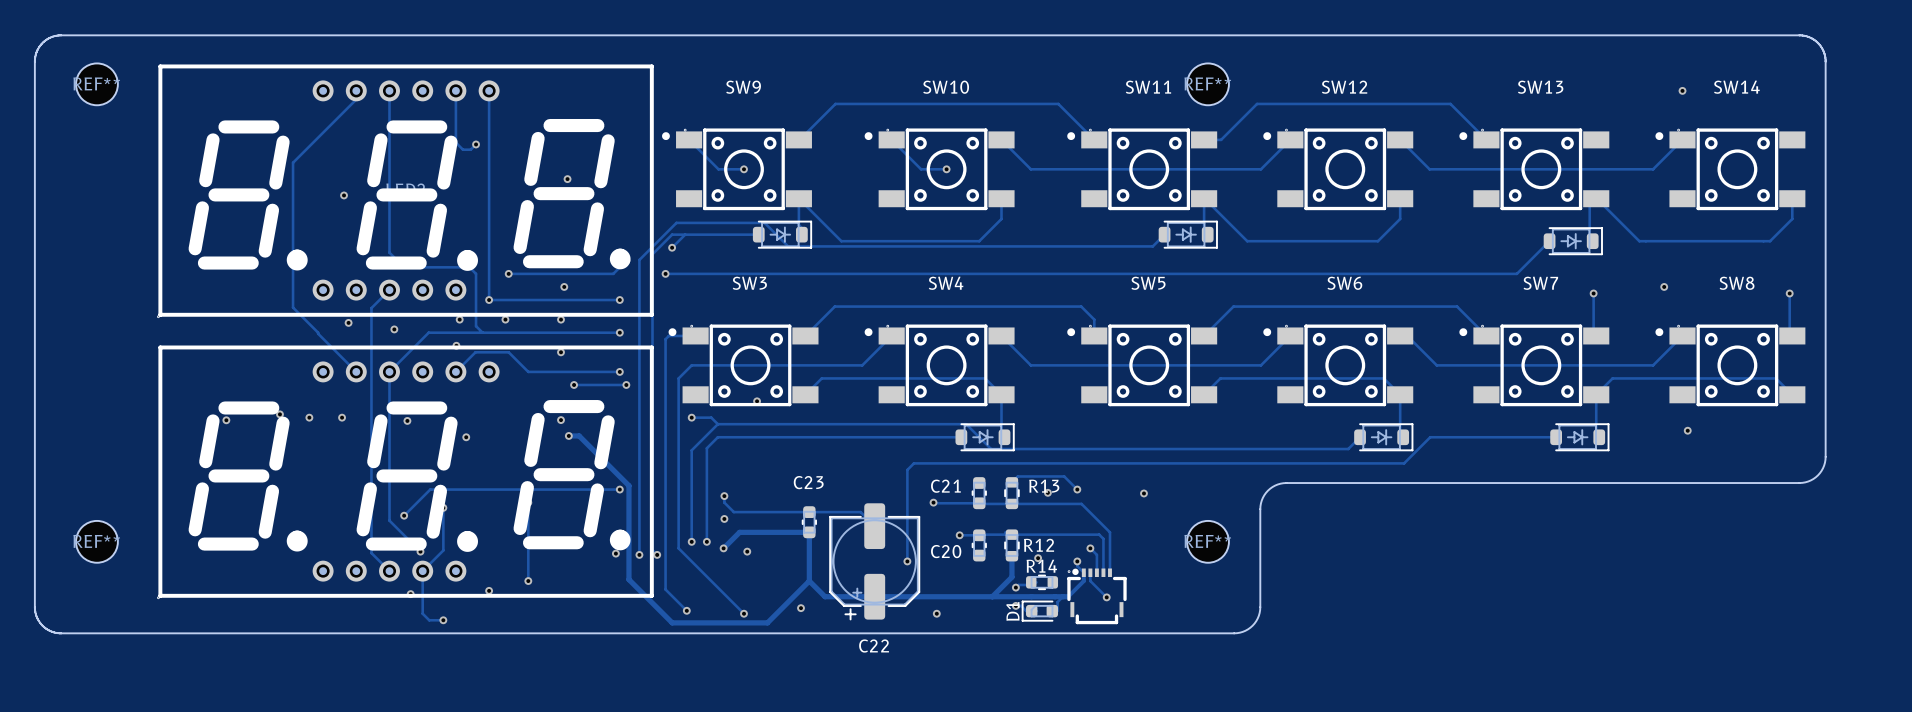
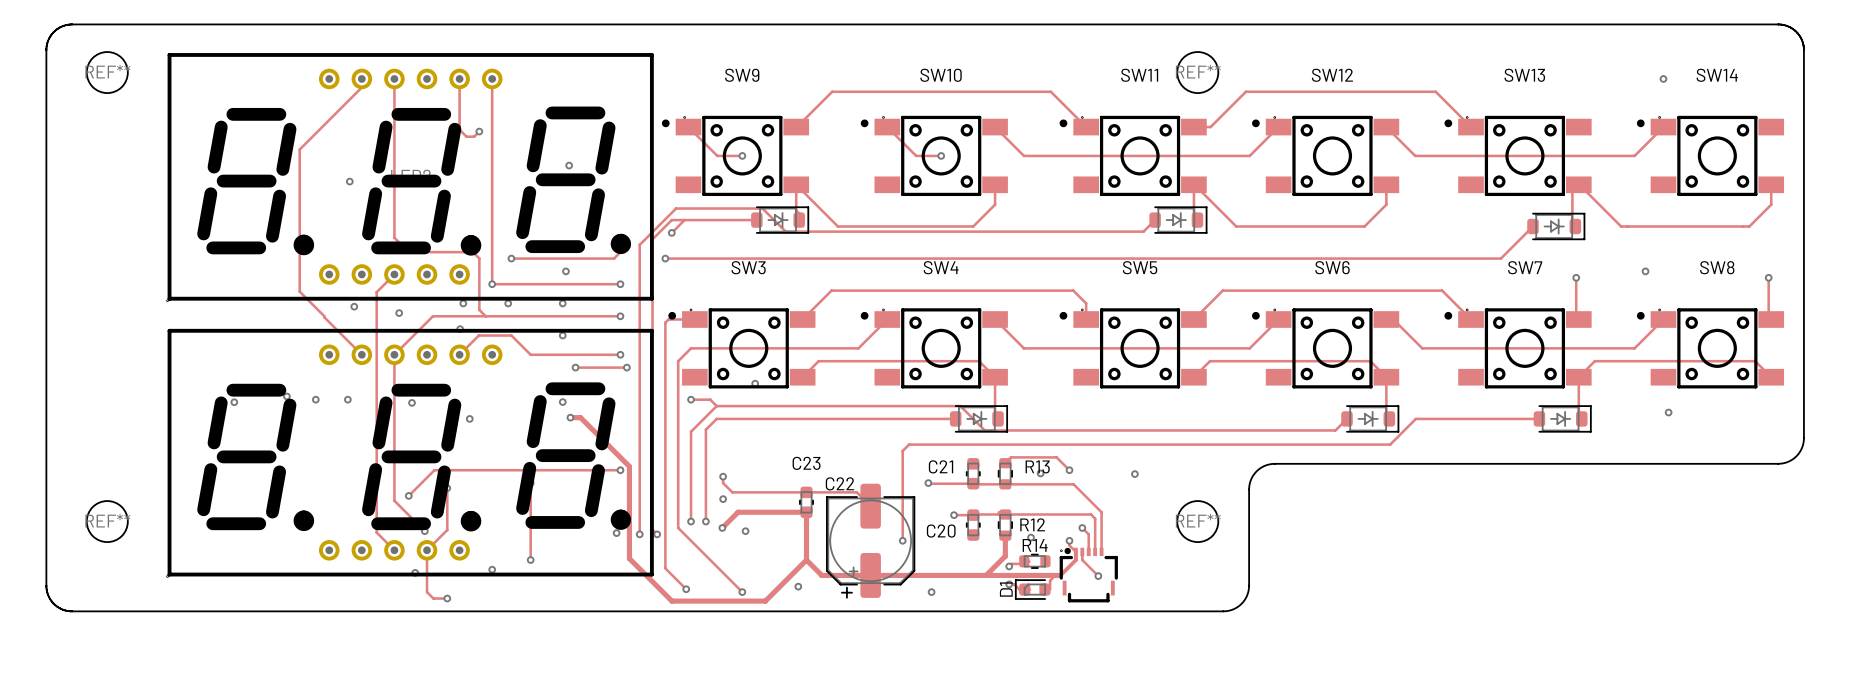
C22 name position: C22 (874, 646) -> C22 (839, 483)

